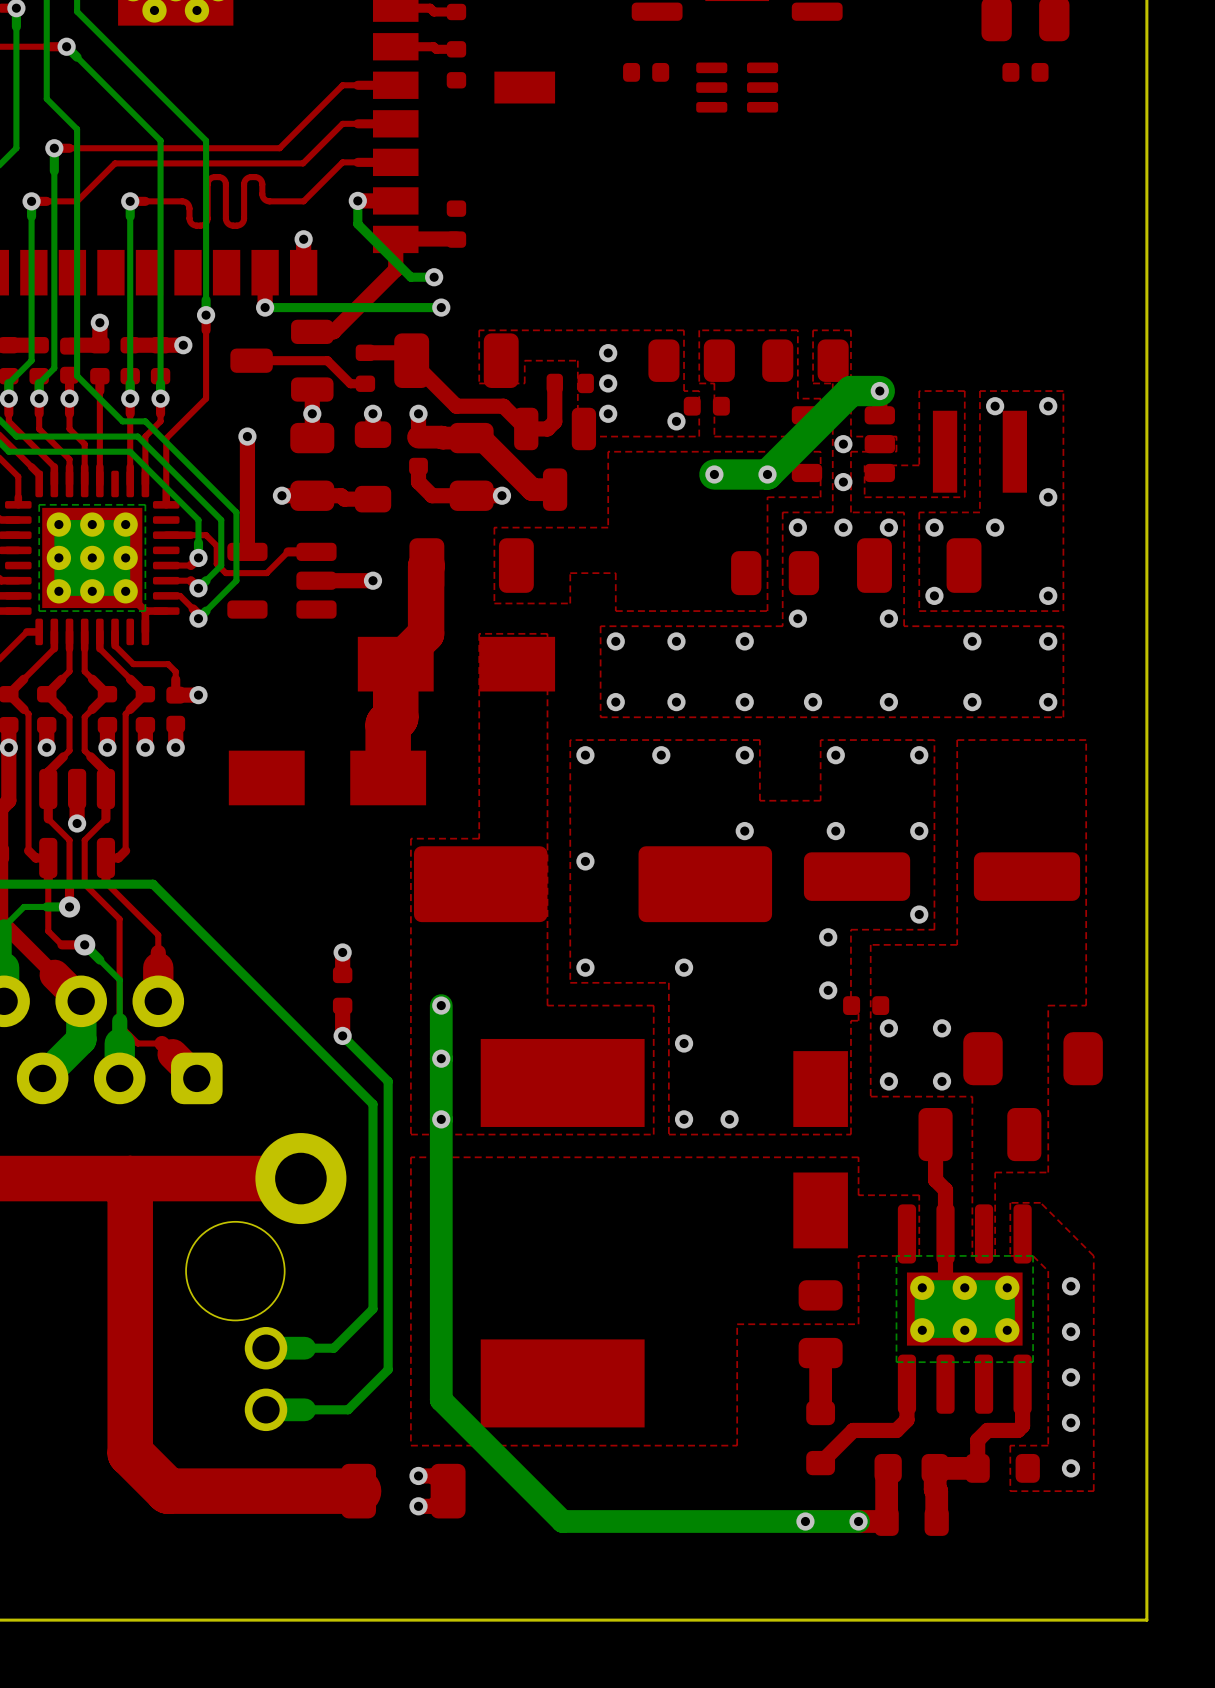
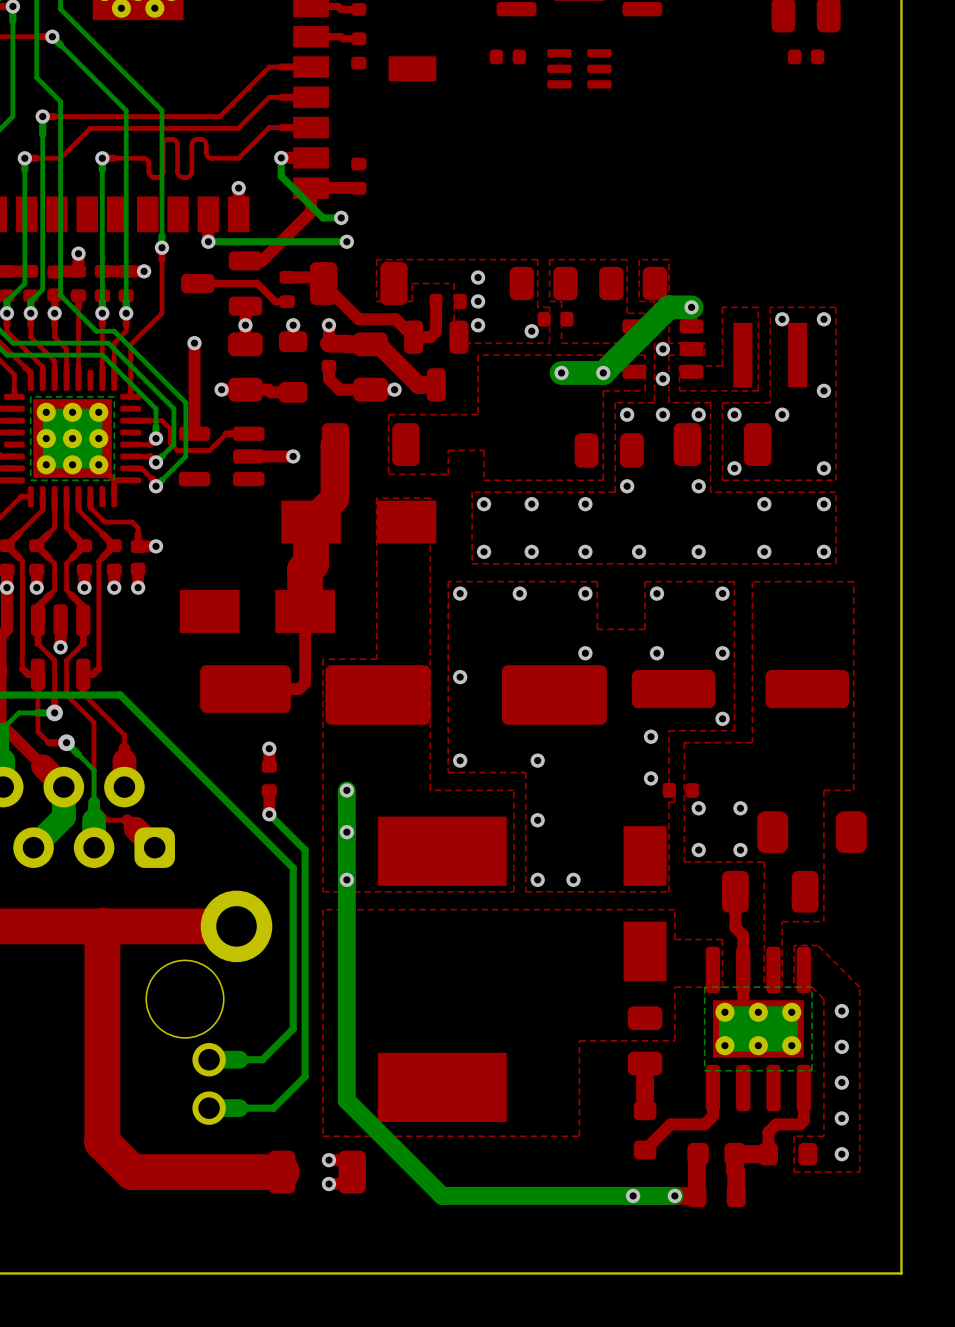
top track: none -> (305, 611) (305, 683) (299, 689) (245, 689)
part: none -> (245, 689)

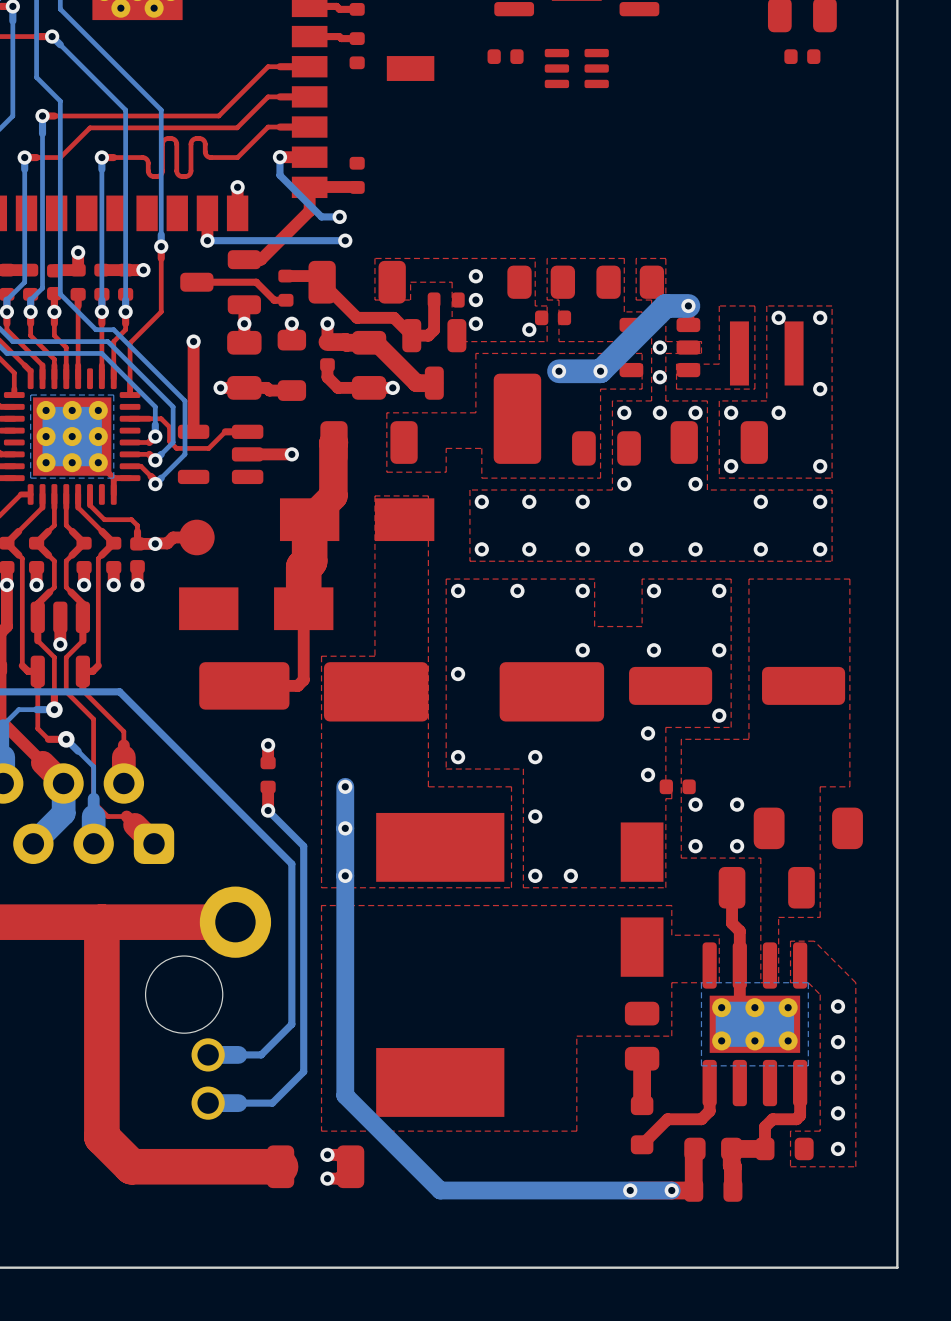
part: none -> (517, 418)
top track: none -> (196, 537) (173, 537) (167, 543) (155, 543)
part: none -> (196, 537)

